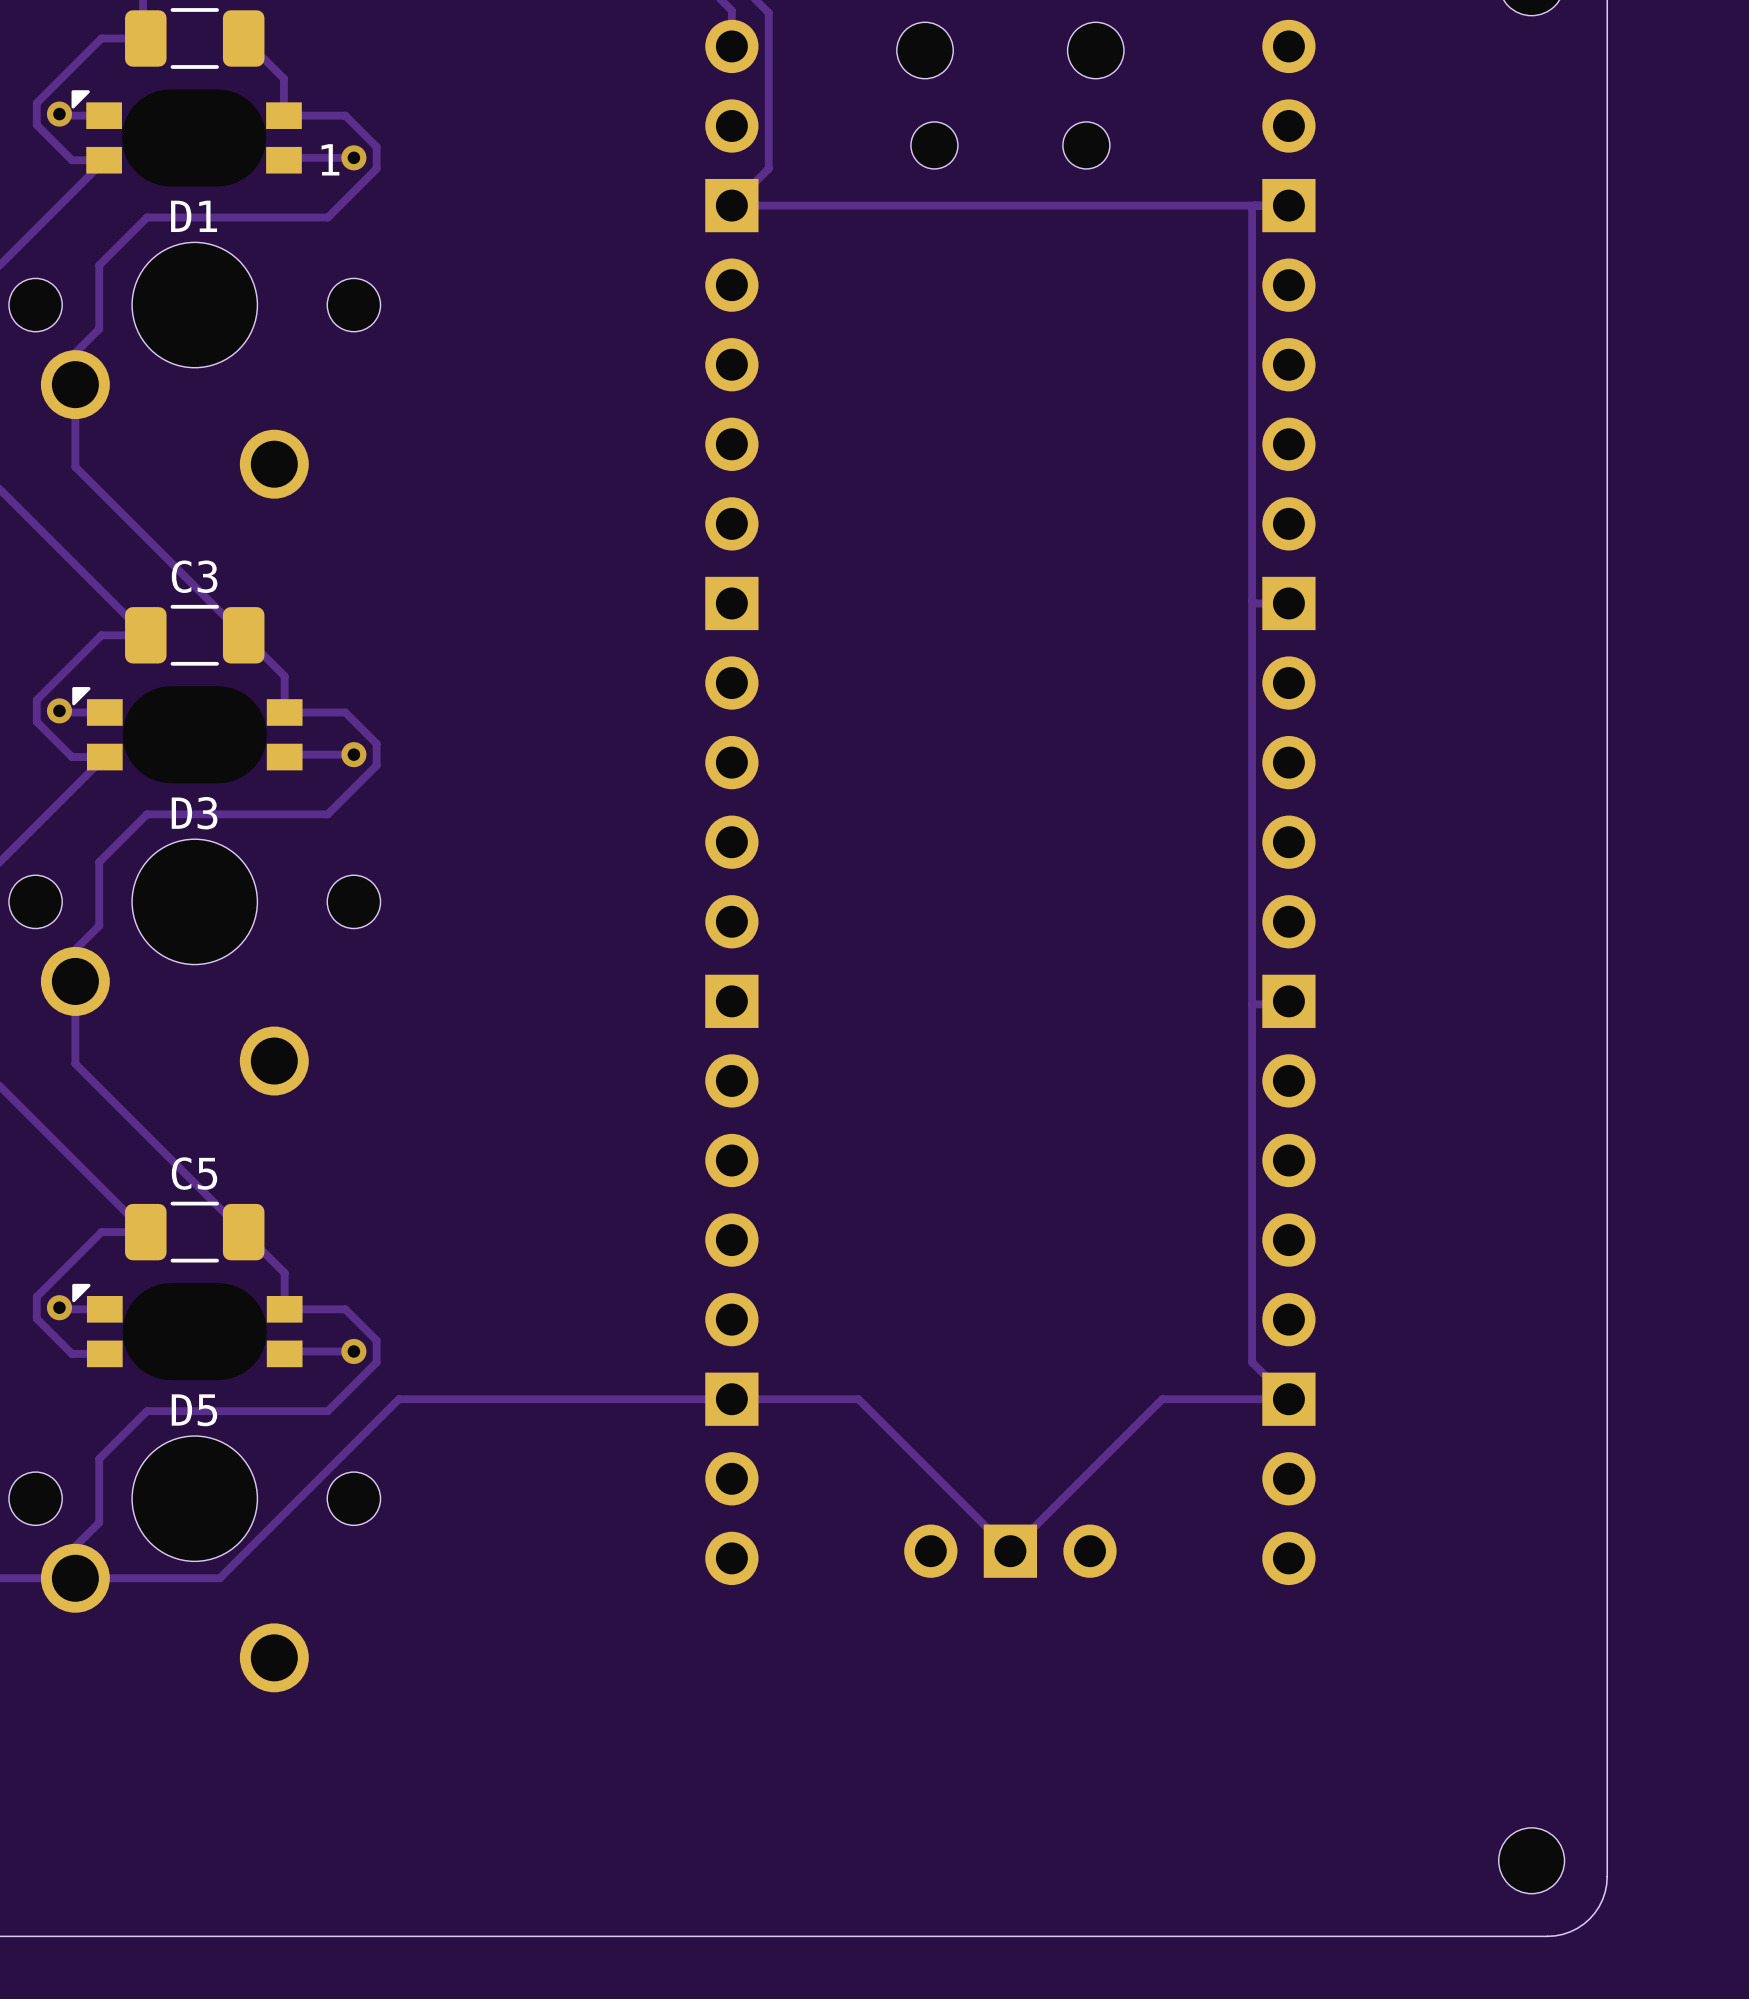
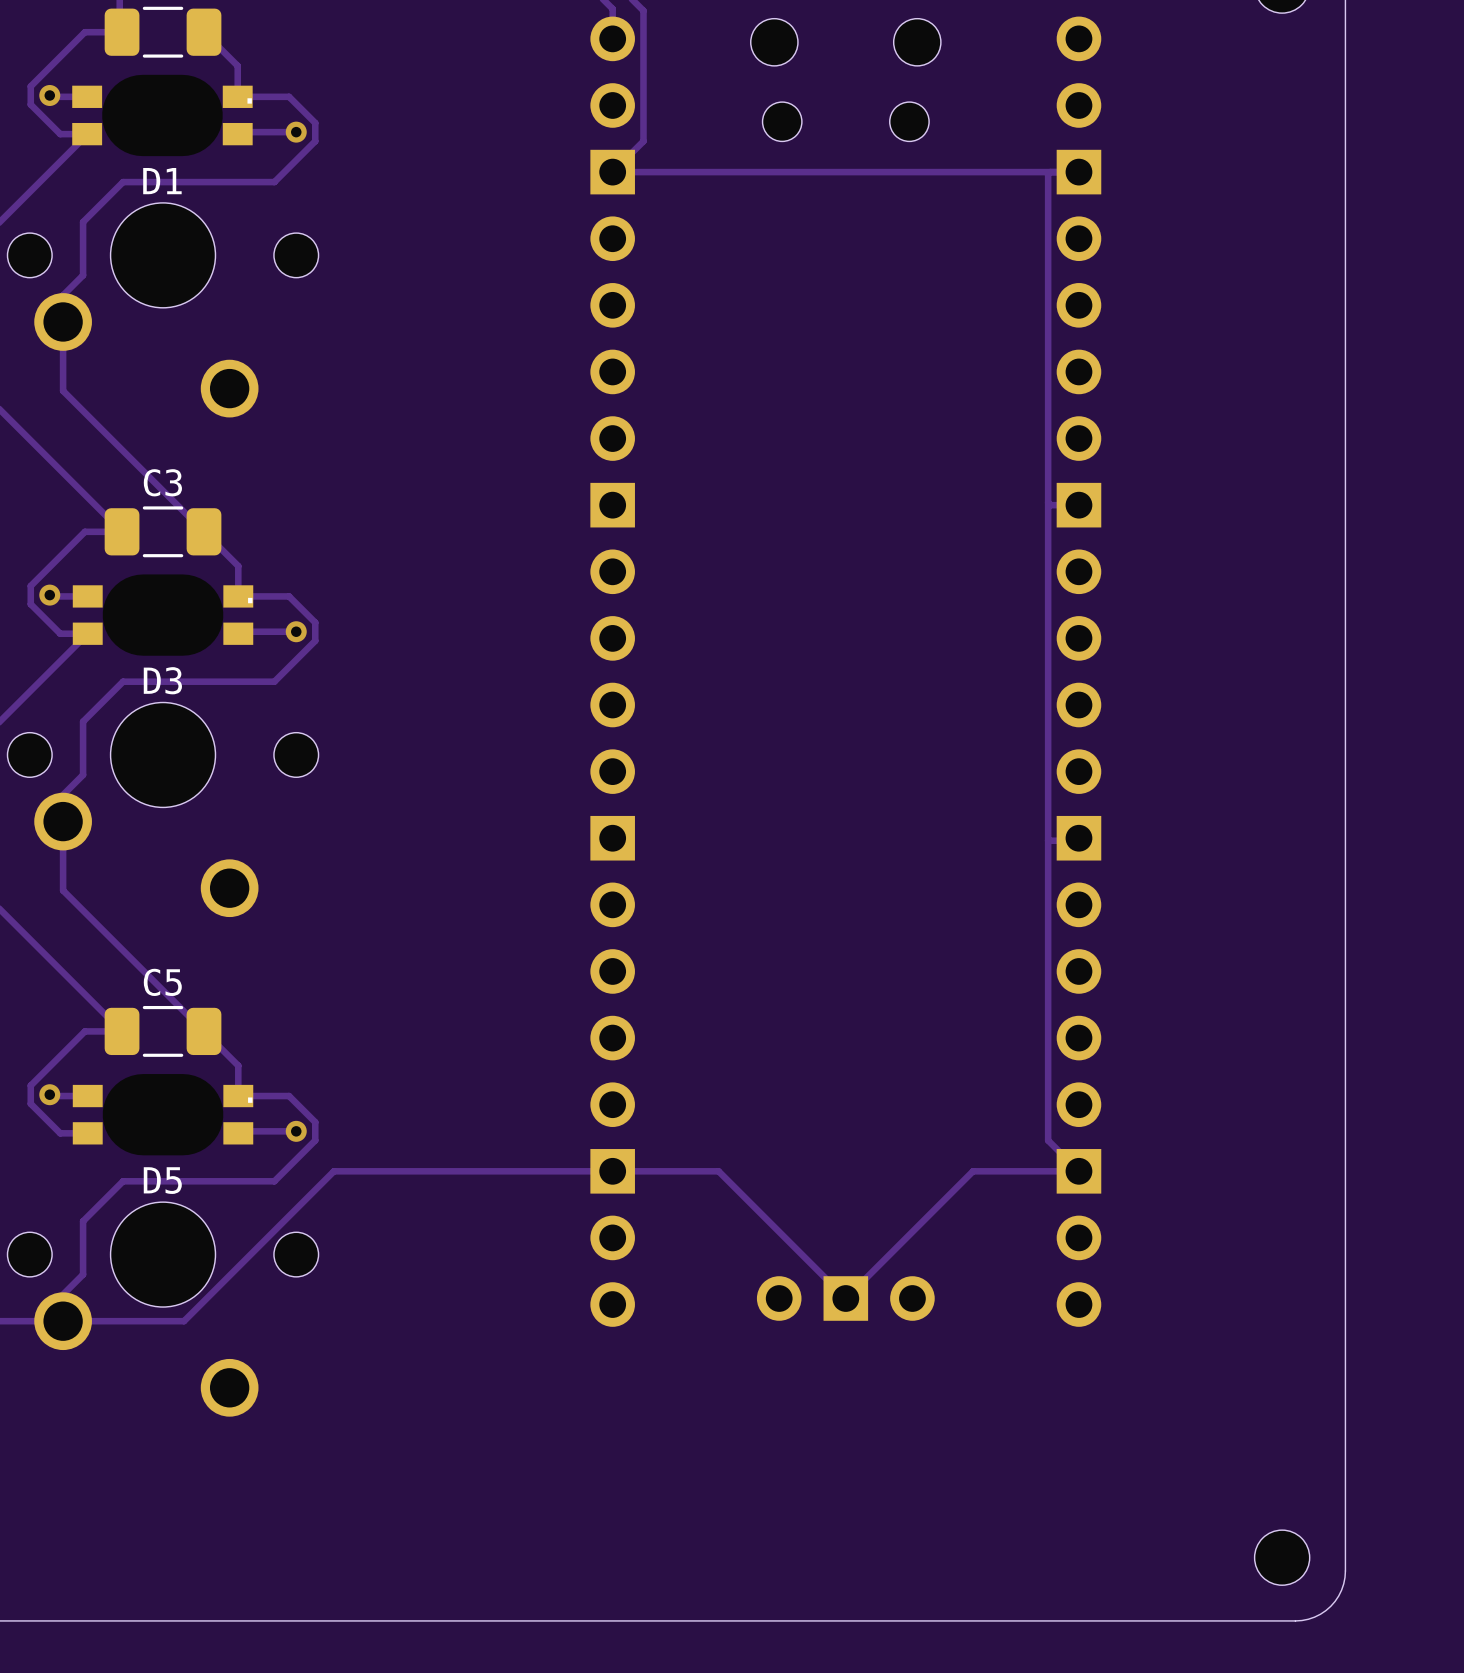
D1 footprint: [71, 89, 302, 187] -> [72, 74, 253, 157]
D3 footprint: [72, 686, 303, 784] -> [72, 574, 254, 656]
D5 footprint: [72, 1283, 303, 1381] -> [72, 1074, 254, 1156]

